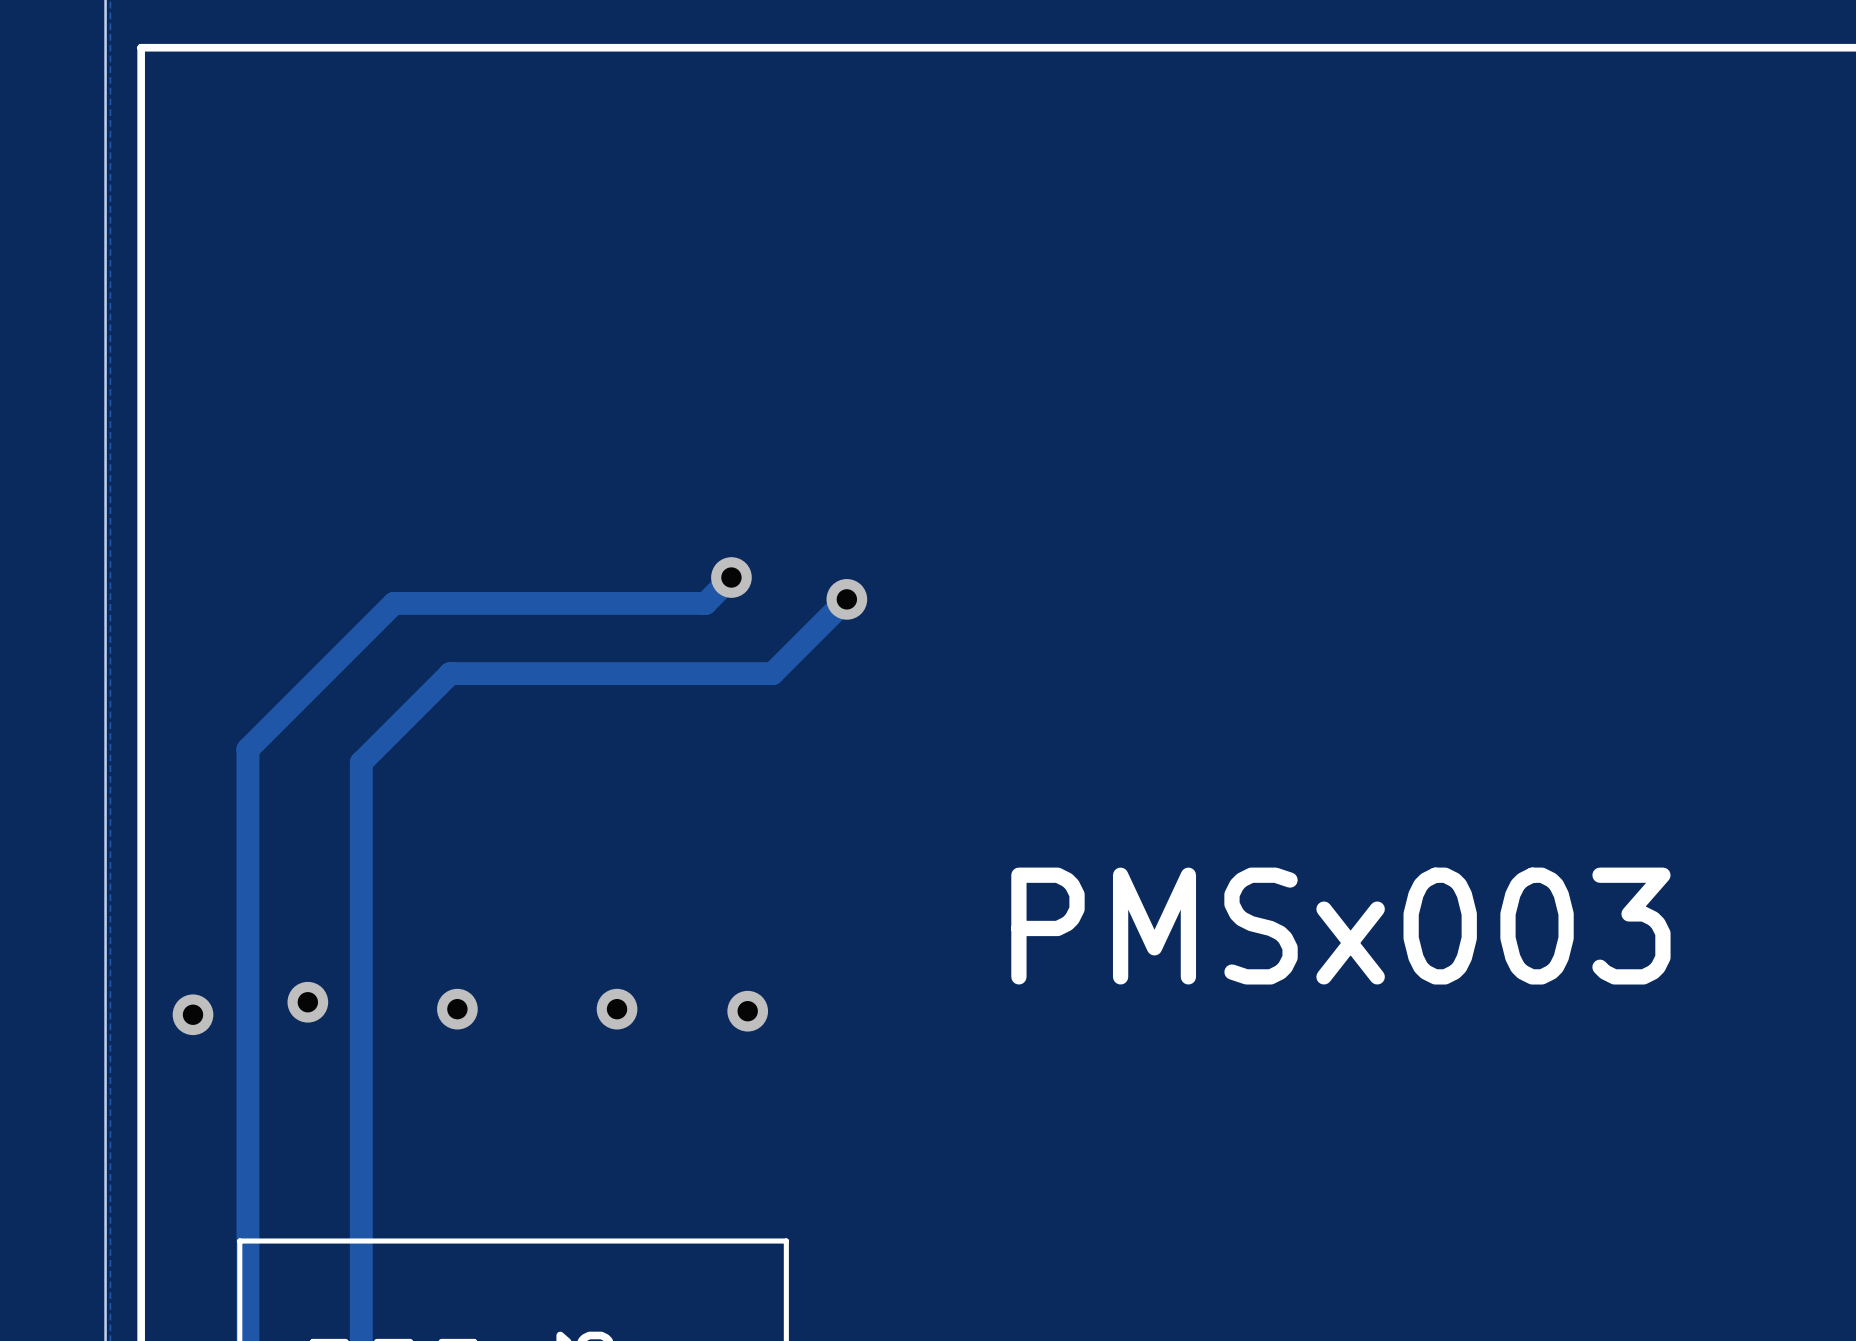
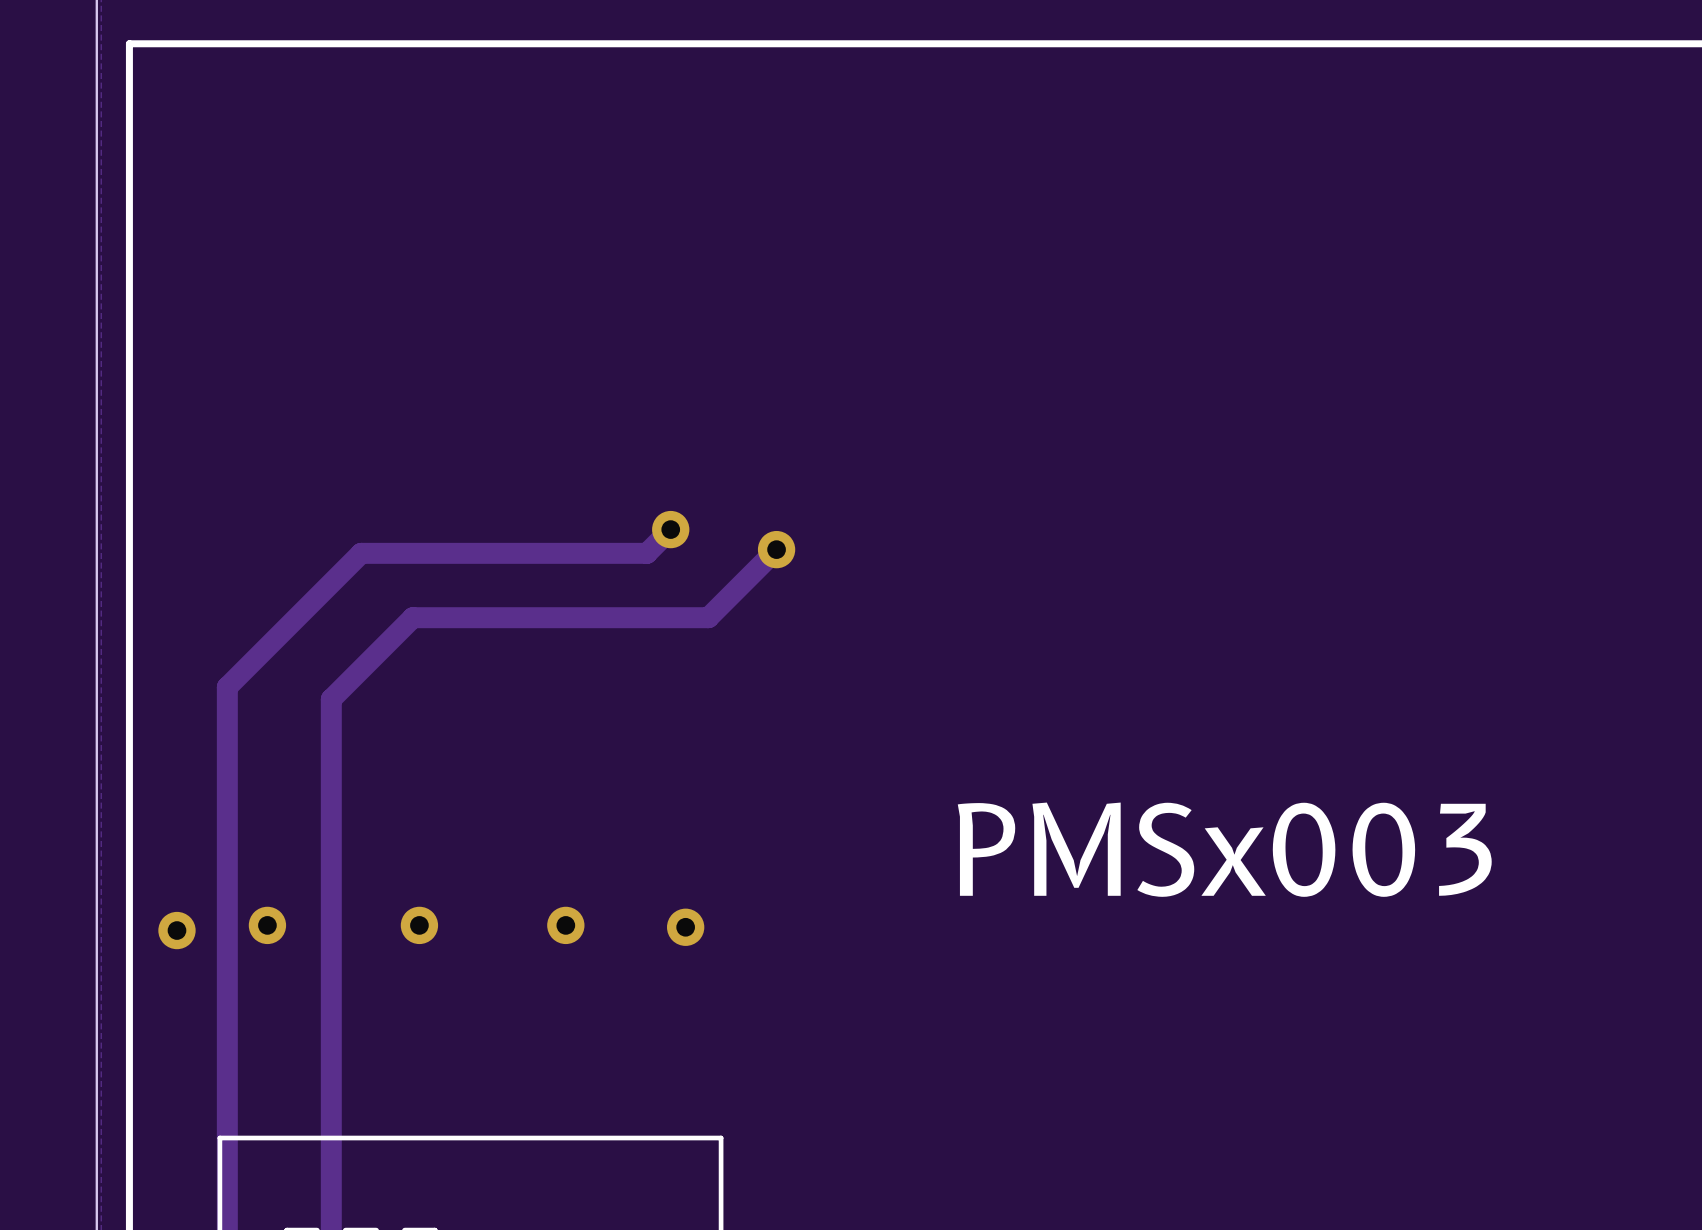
via position: (307, 1002) -> (267, 925)

